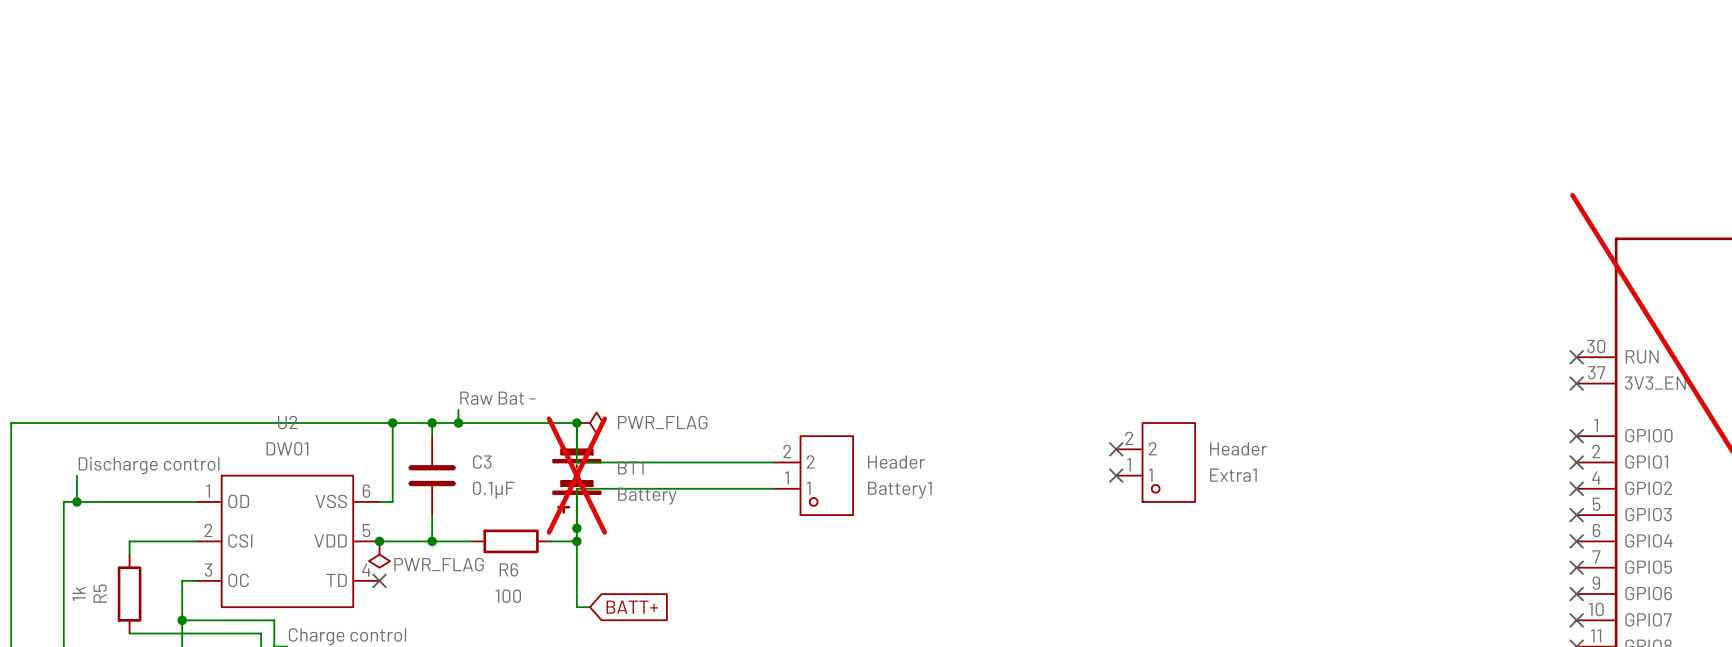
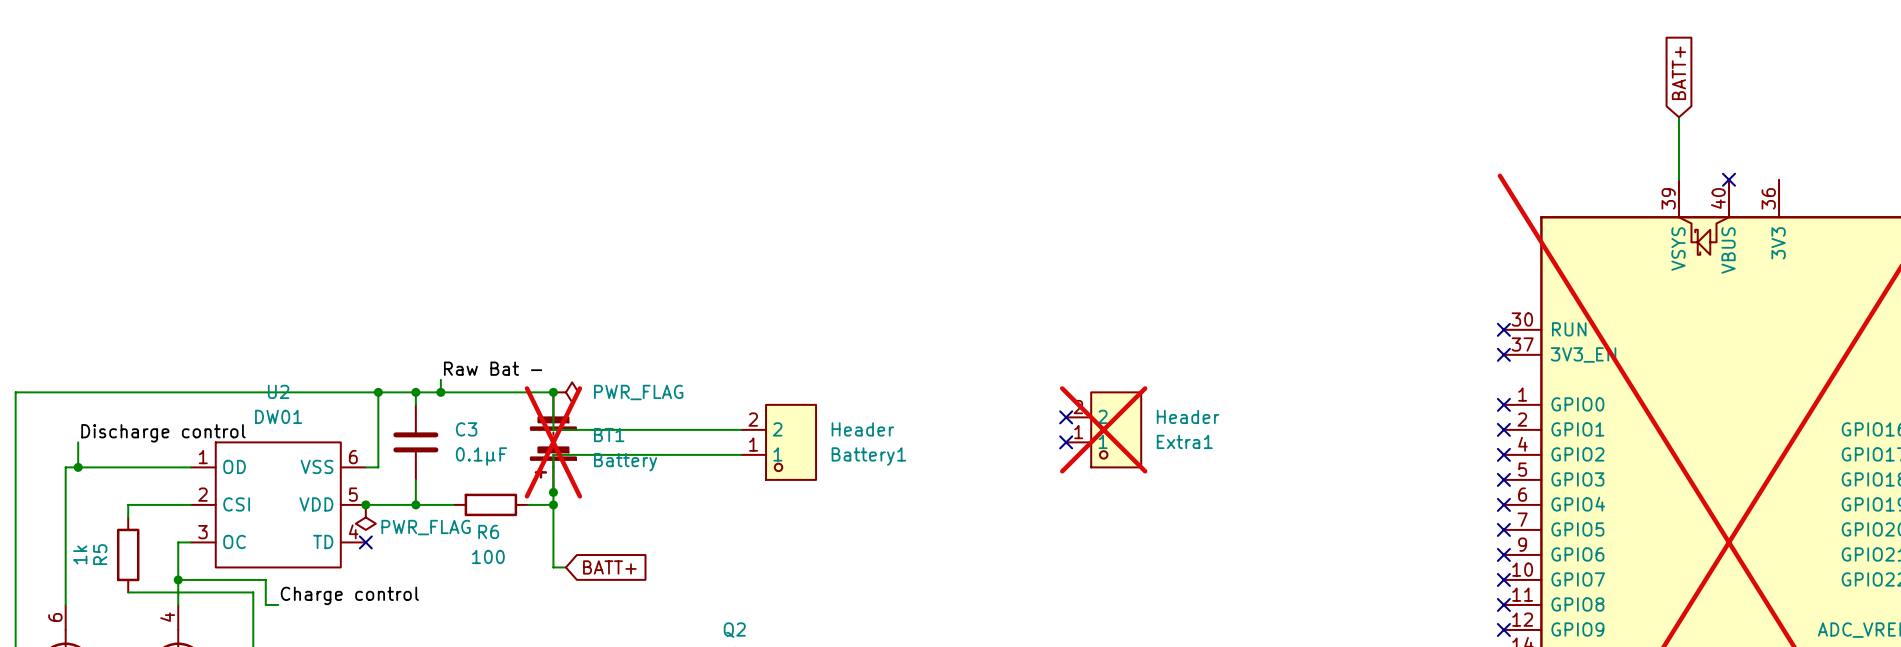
Extra1 do-not-place cross: none -> (1103, 429)

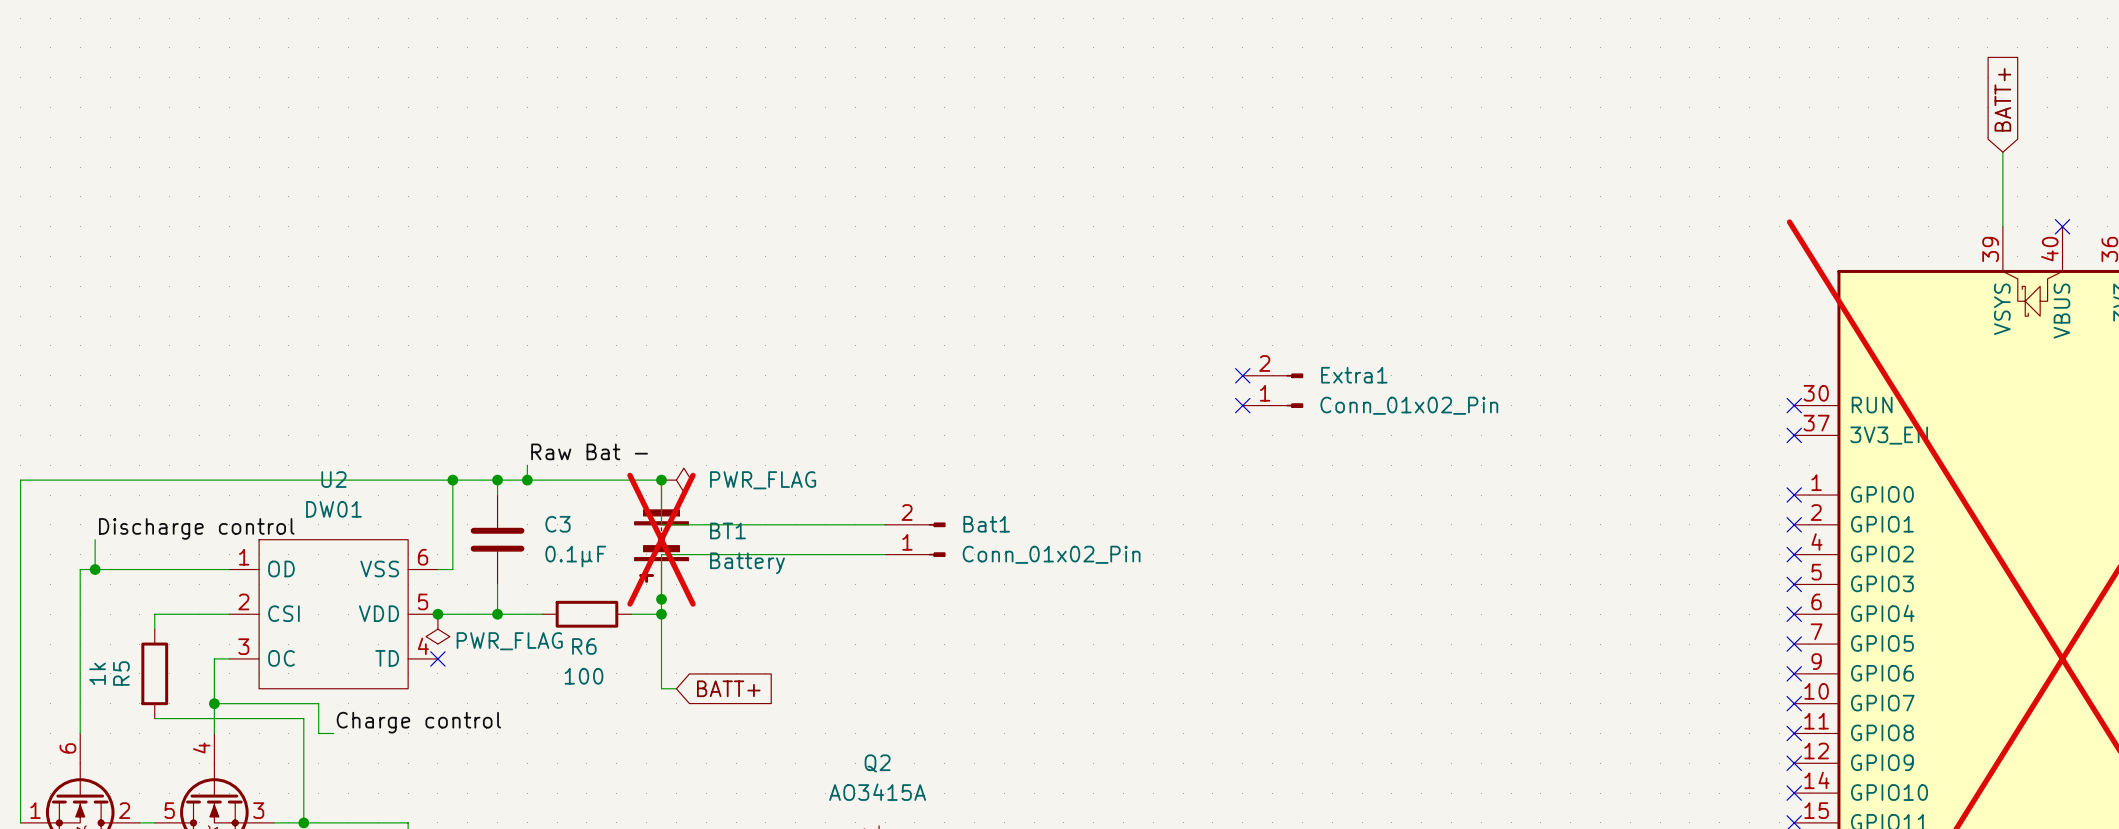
no-connect mark: none -> (1242, 375)
no-connect mark: none -> (1242, 405)
Extra1 symbol: [1066, 392, 1142, 468] -> [1242, 373, 1304, 408]
Extra1 value: Header (1188, 416) -> Conn_01x02_Pin (1409, 405)
no-connect mark: (1066, 417) -> none
Extra1 do-not-place cross: (1103, 429) -> none
Extra1 name position: Extra1 (1184, 441) -> Extra1 (1354, 375)
Bat1: none -> Conn_01x02_Pin (915, 539)
Battery1: Header (778, 442) -> none
no-connect mark: (1066, 442) -> none

